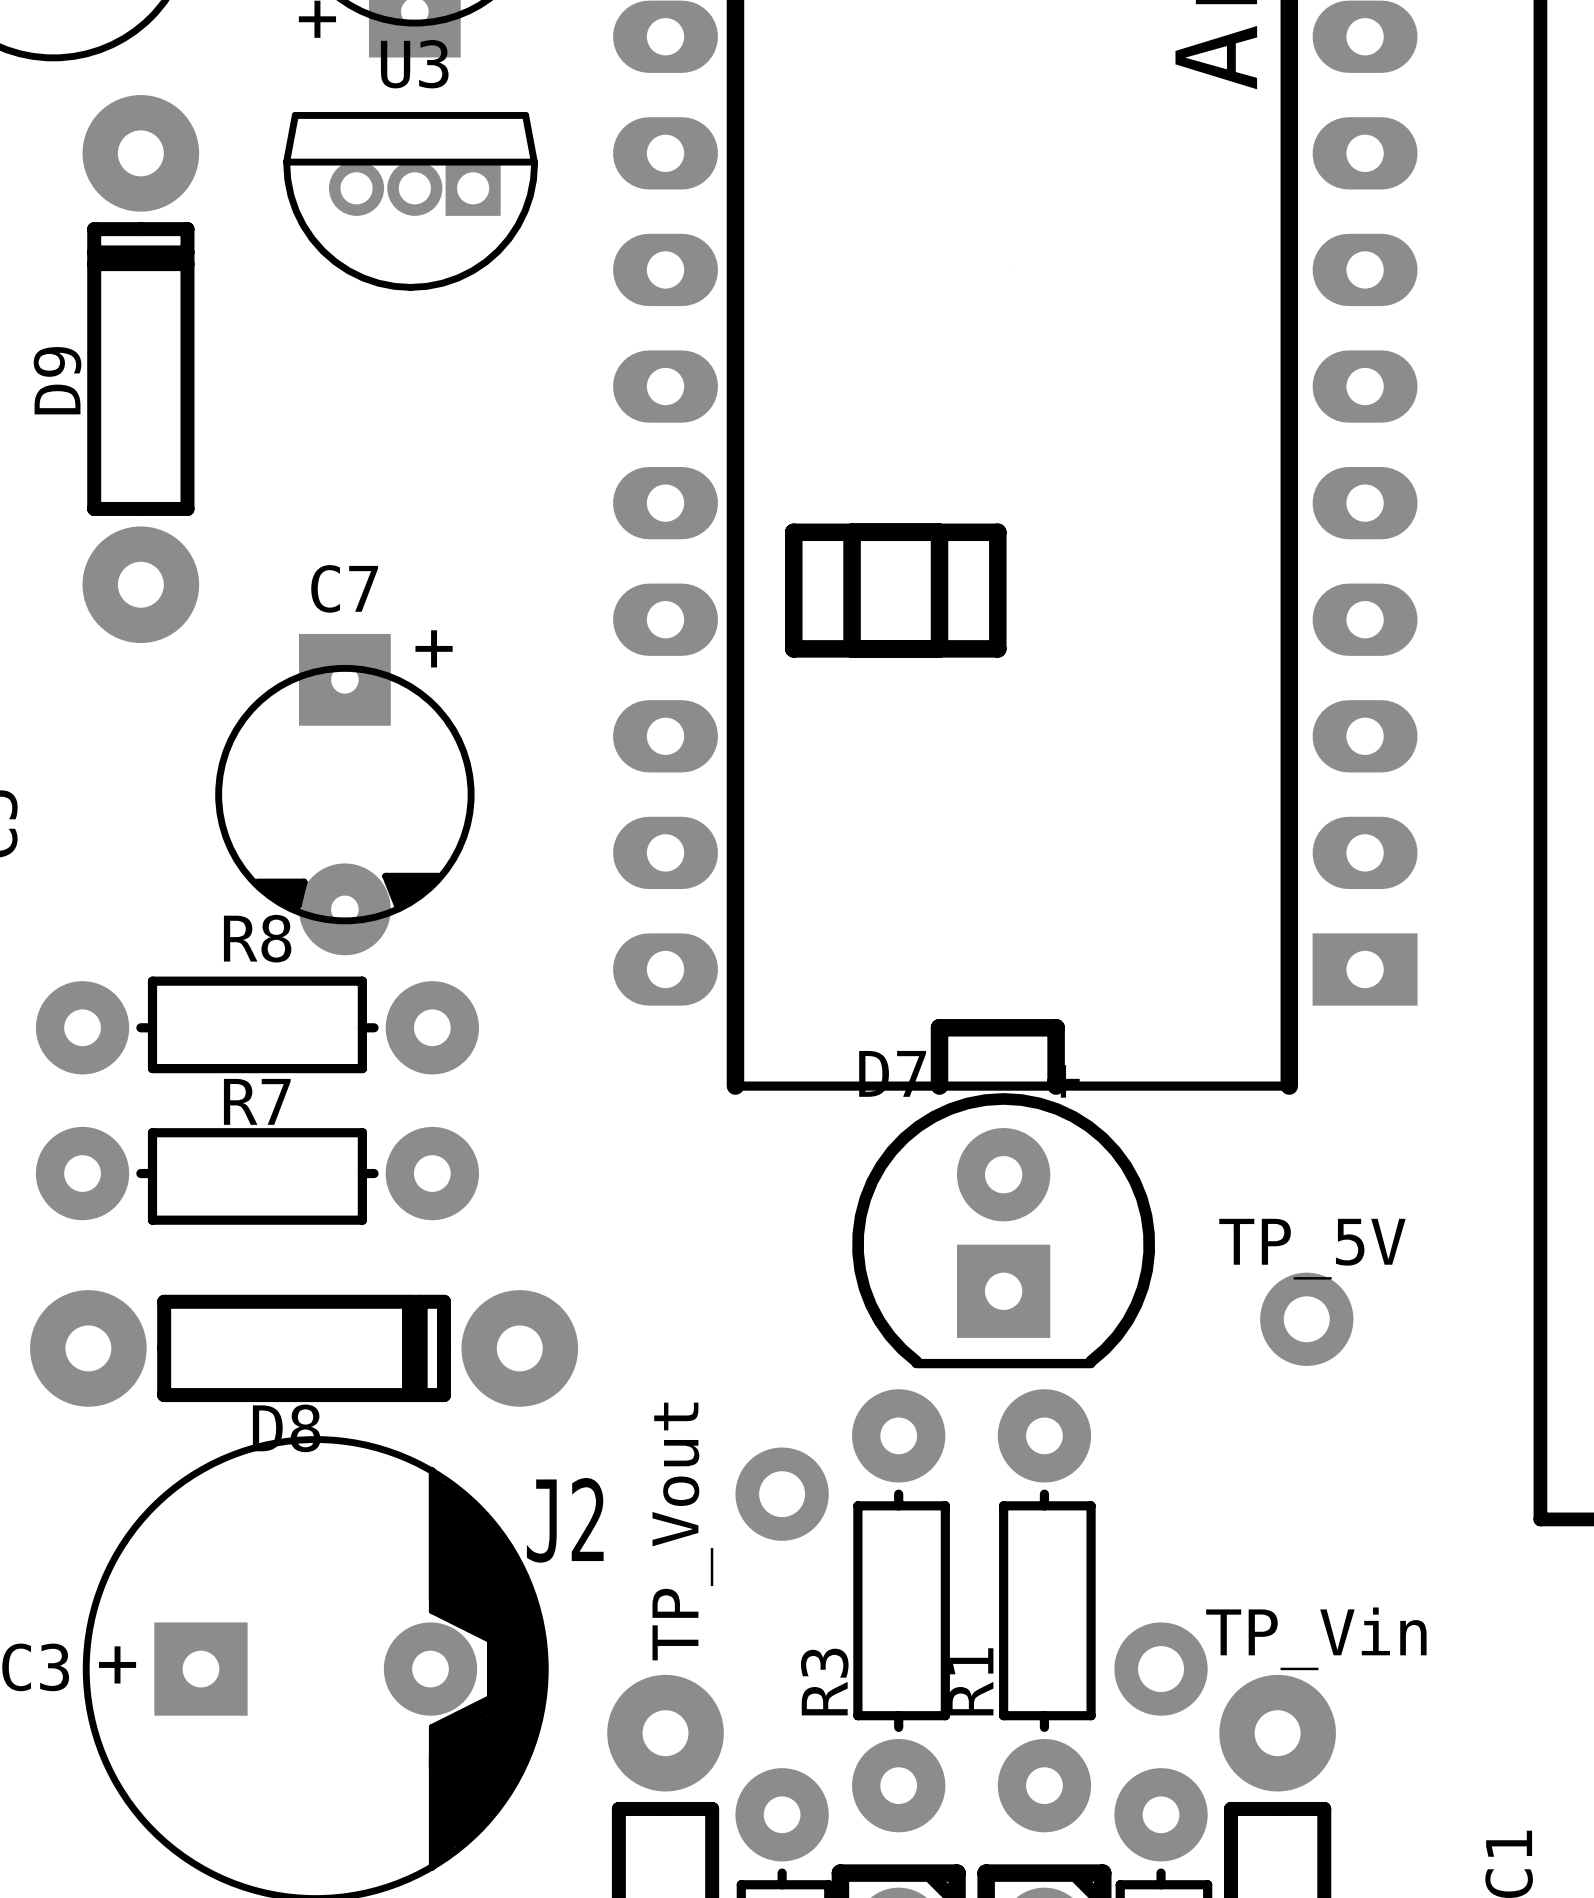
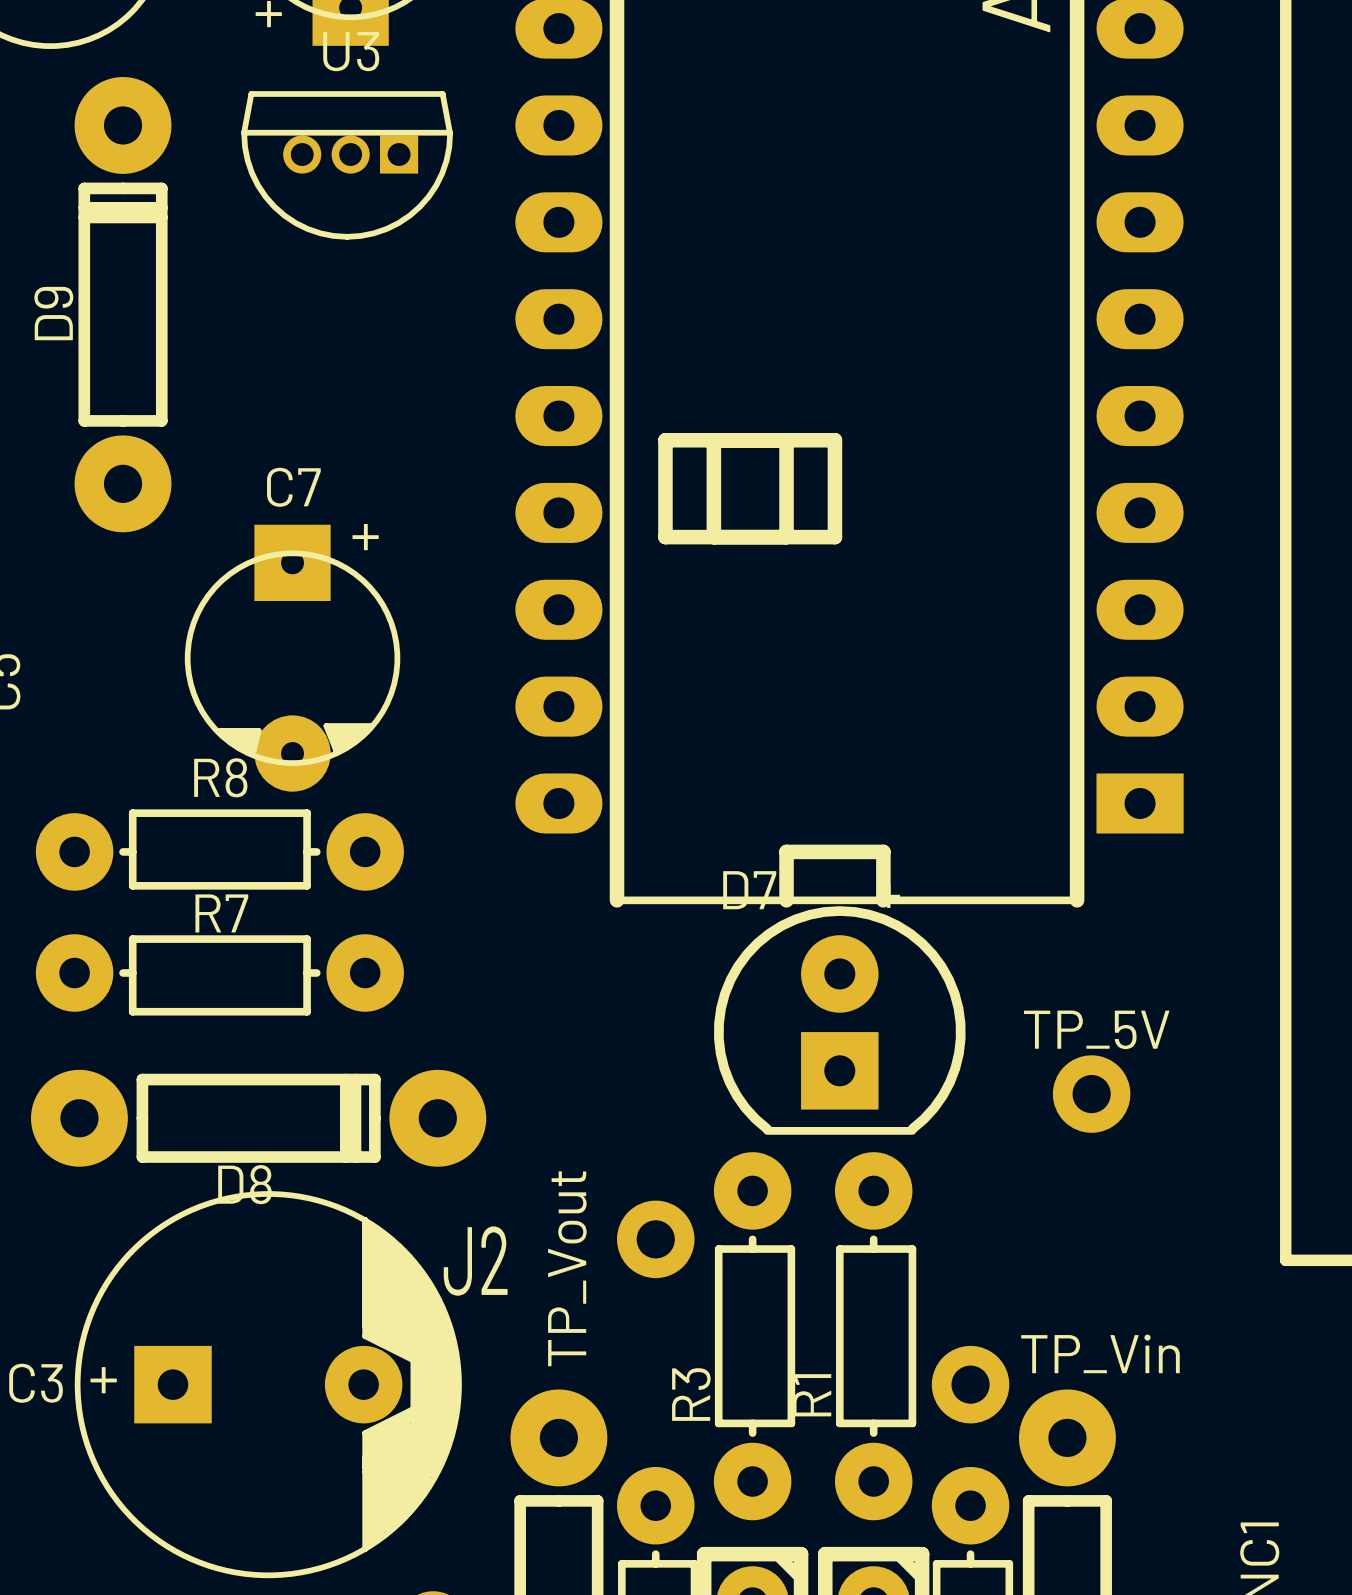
U3 footprint: [283, 112, 539, 291] -> [241, 91, 453, 240]

